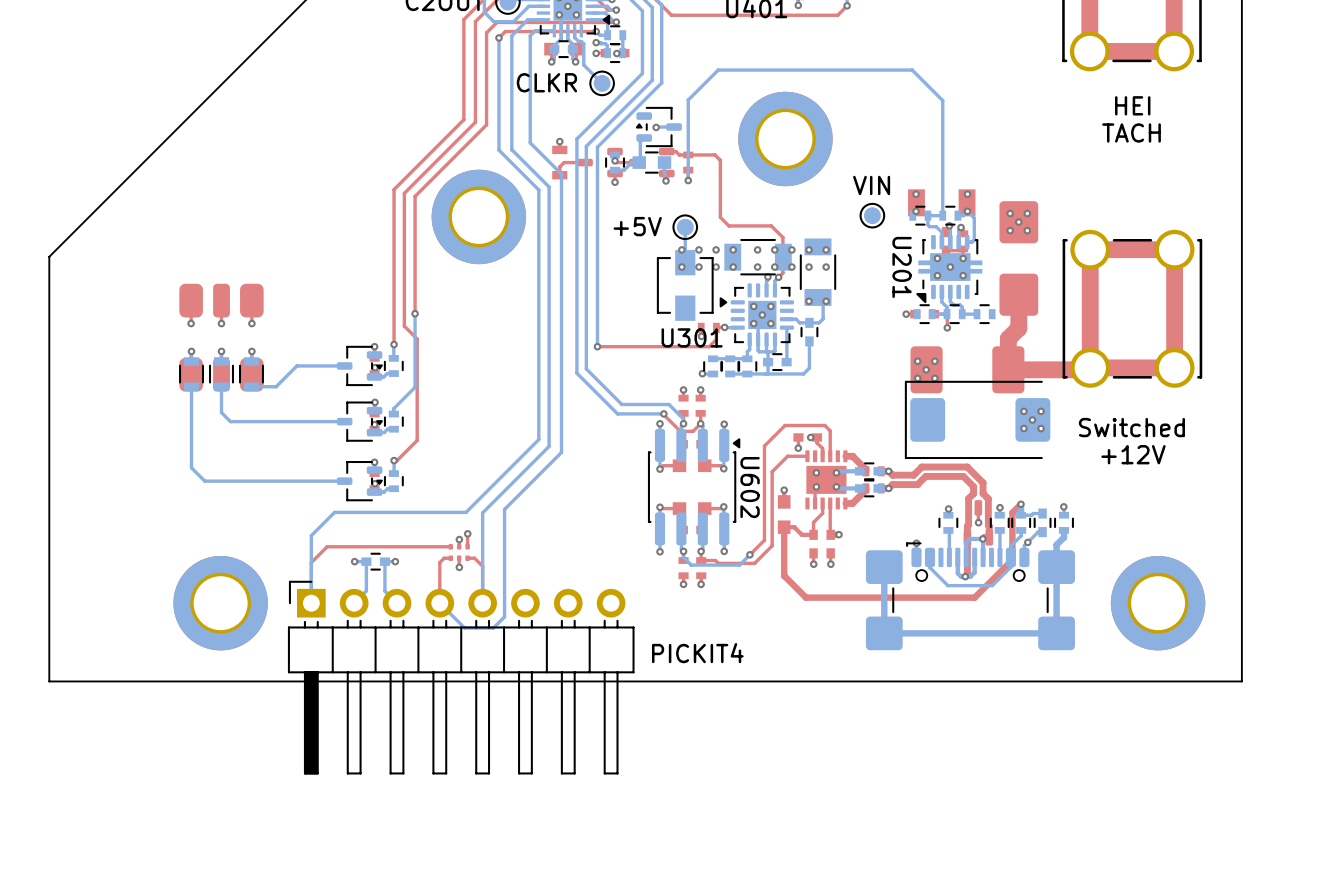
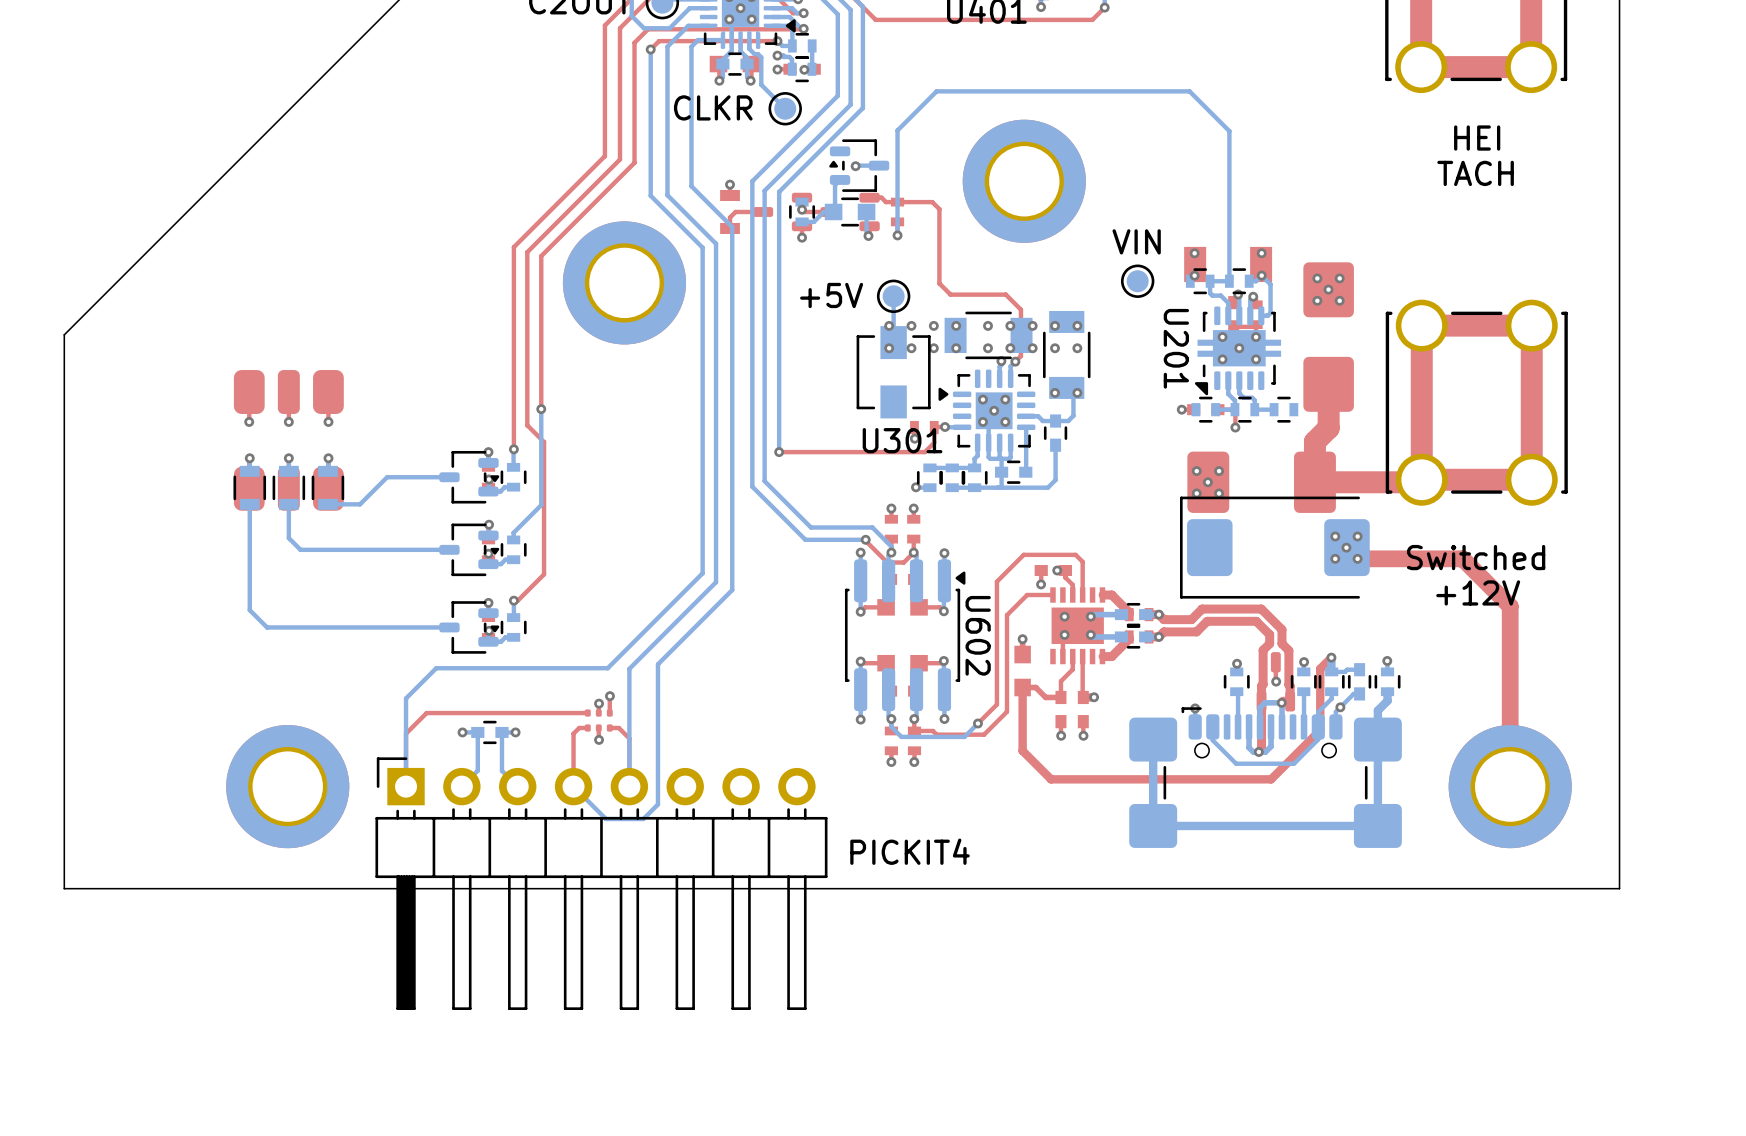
top track: none -> (1357, 558) (1462, 558) (1510, 606) (1510, 786)

